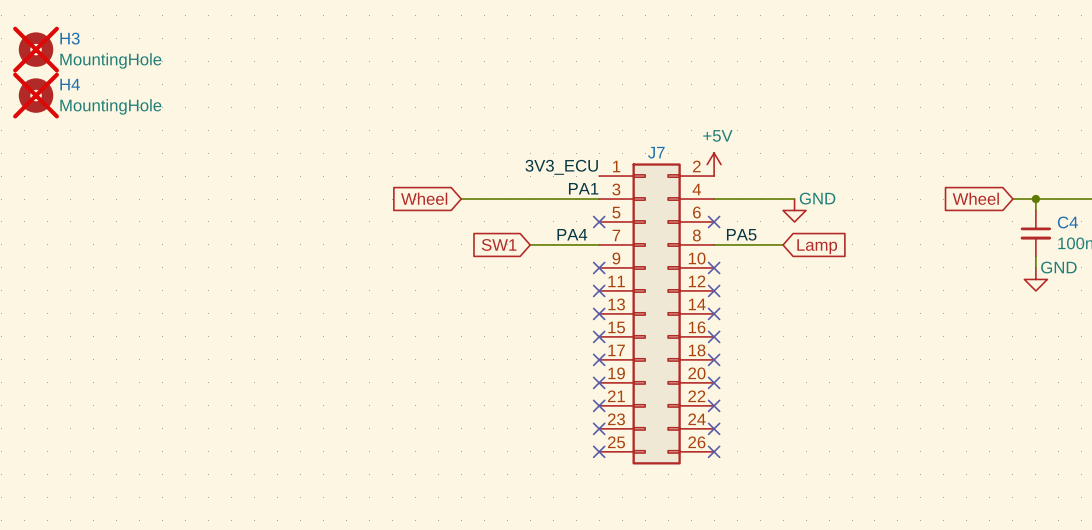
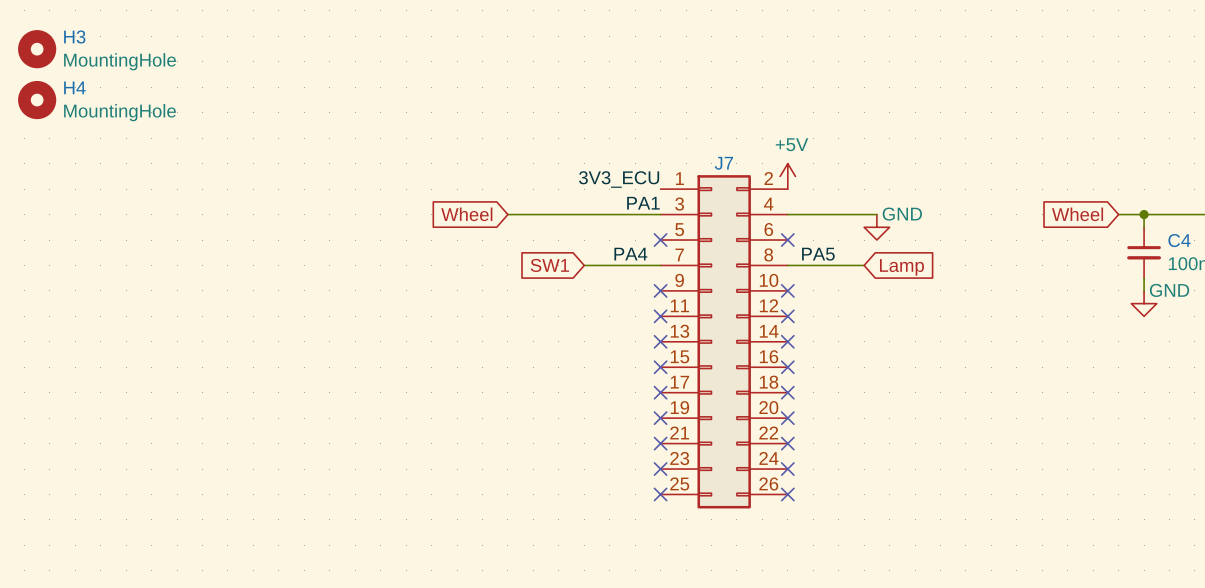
H3 do-not-place cross: (36, 49) -> none
H4 do-not-place cross: (36, 95) -> none

